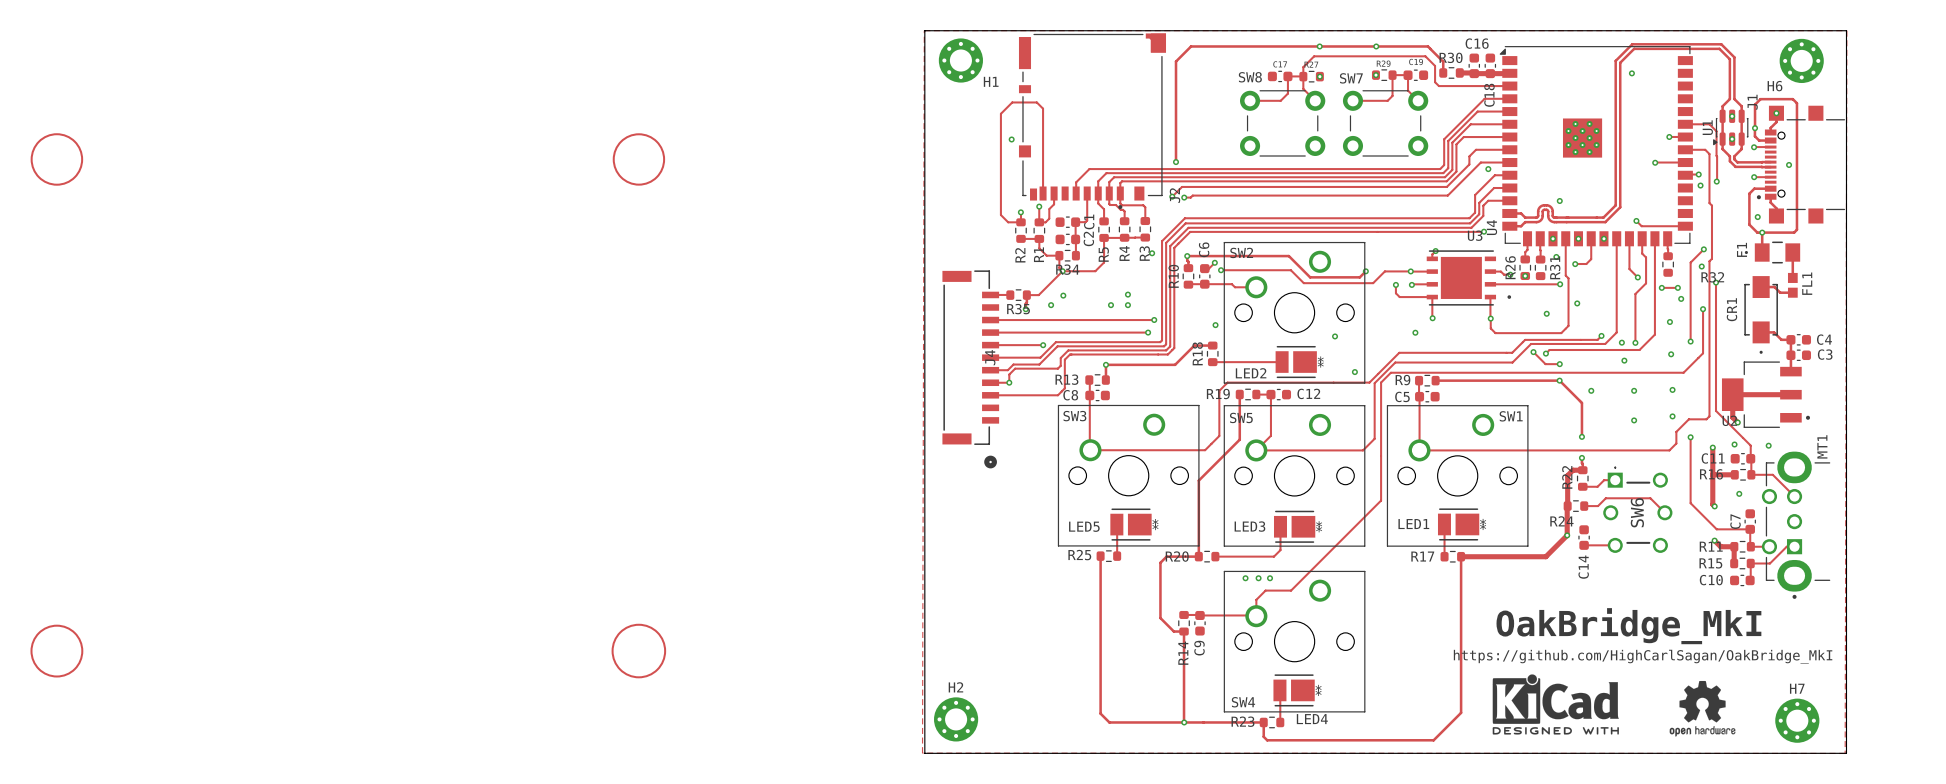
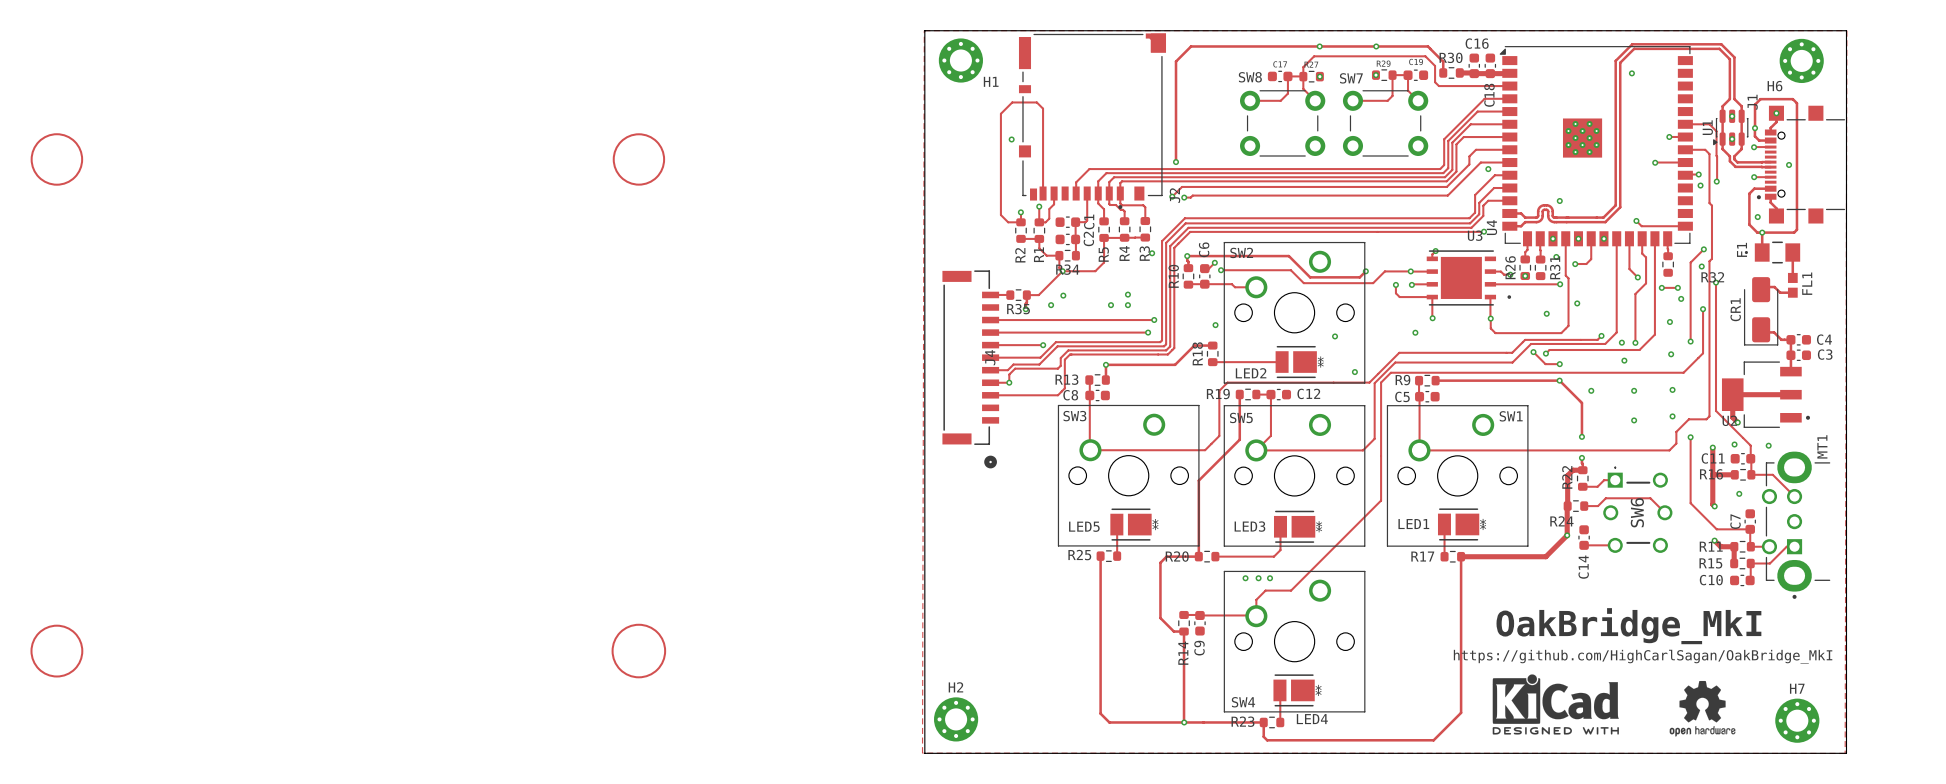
CR1 footprint: [1744, 276, 1778, 354] -> [1743, 277, 1779, 346]

